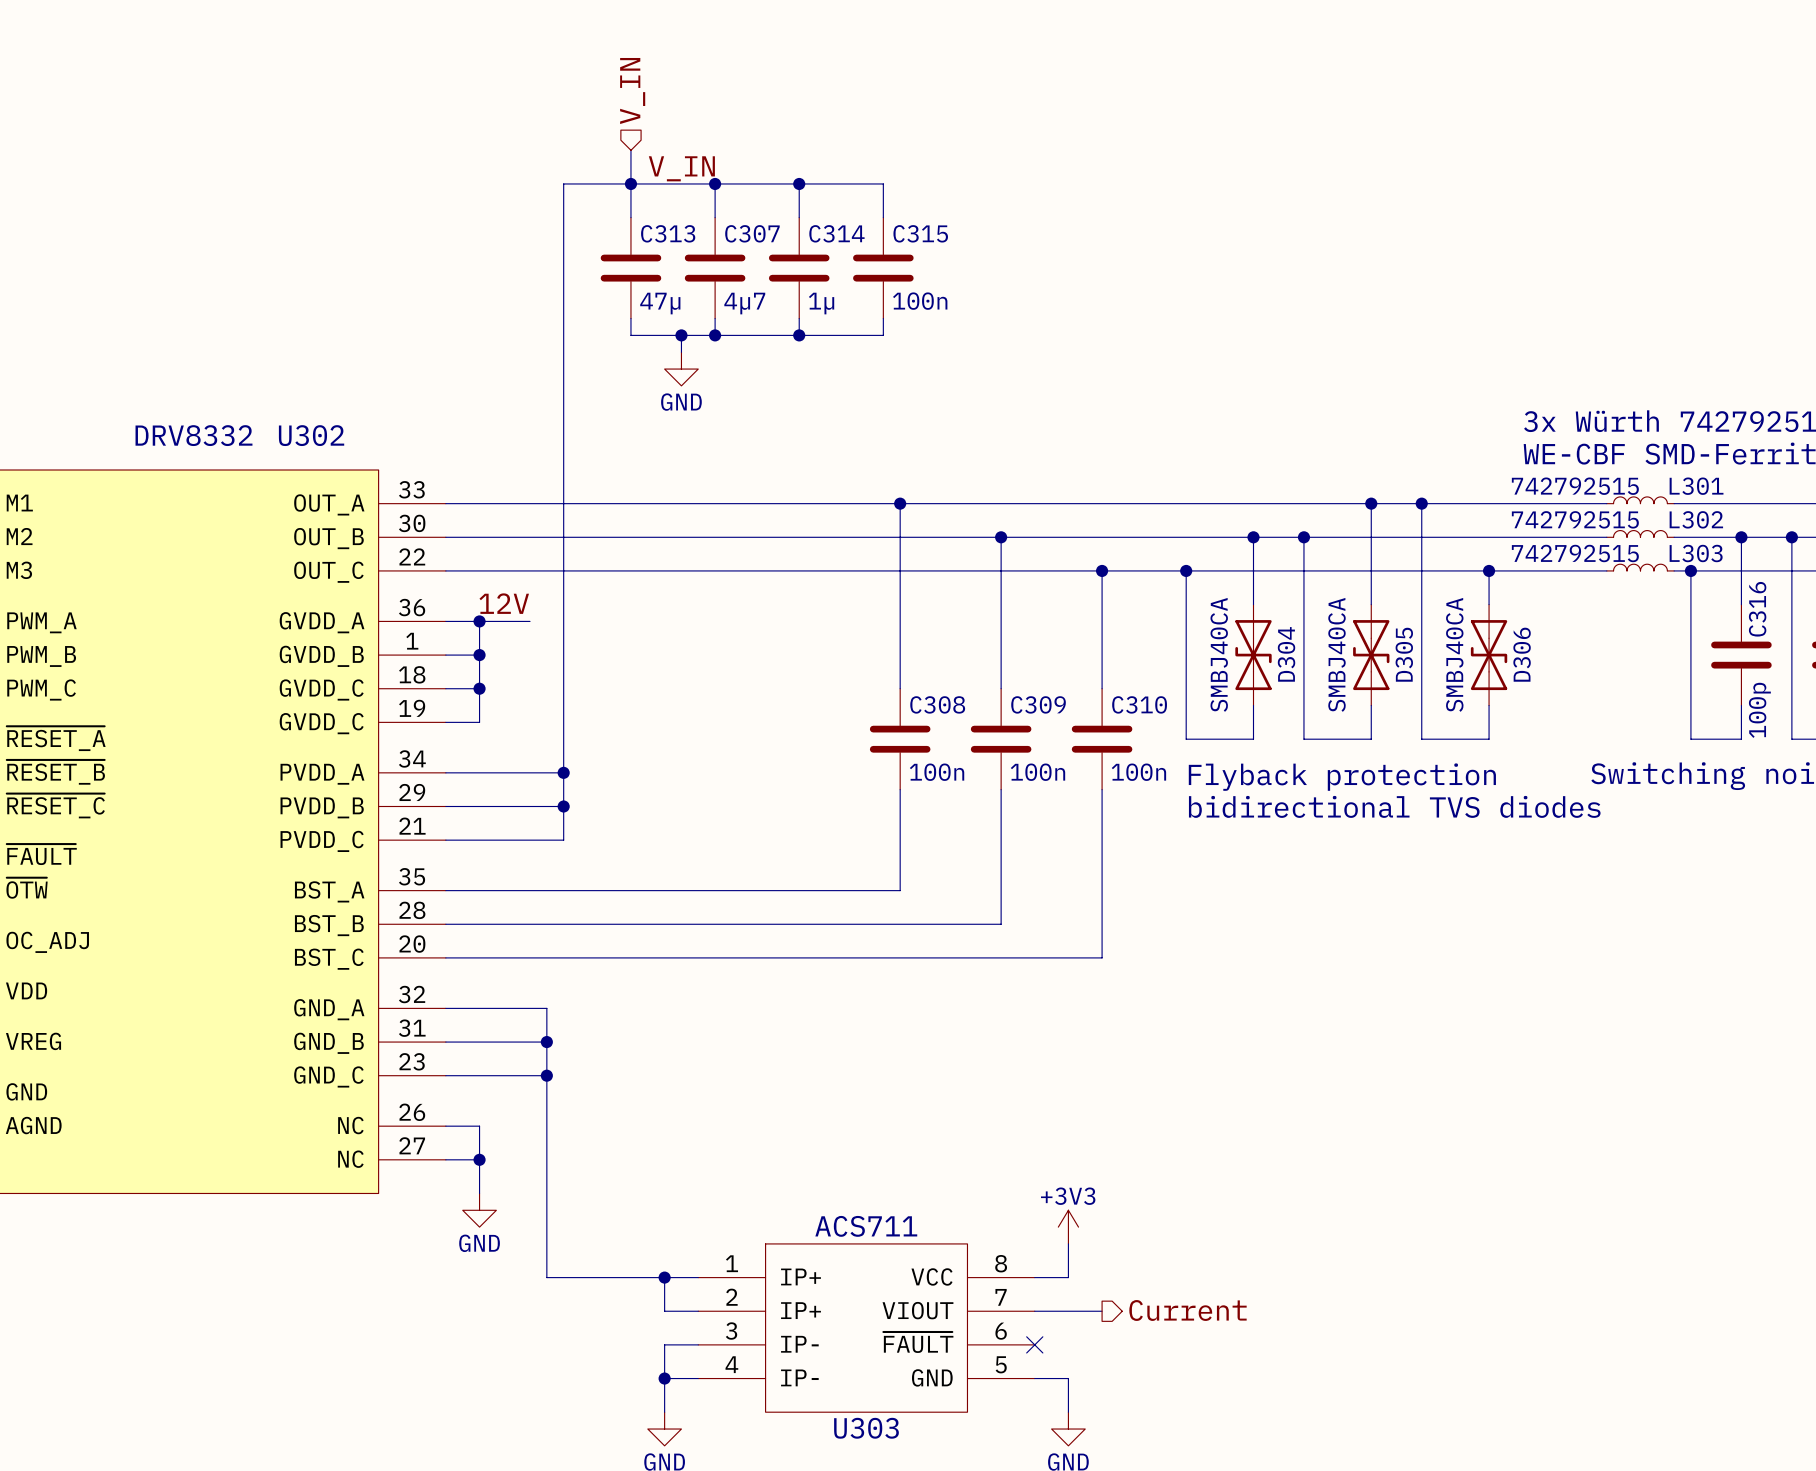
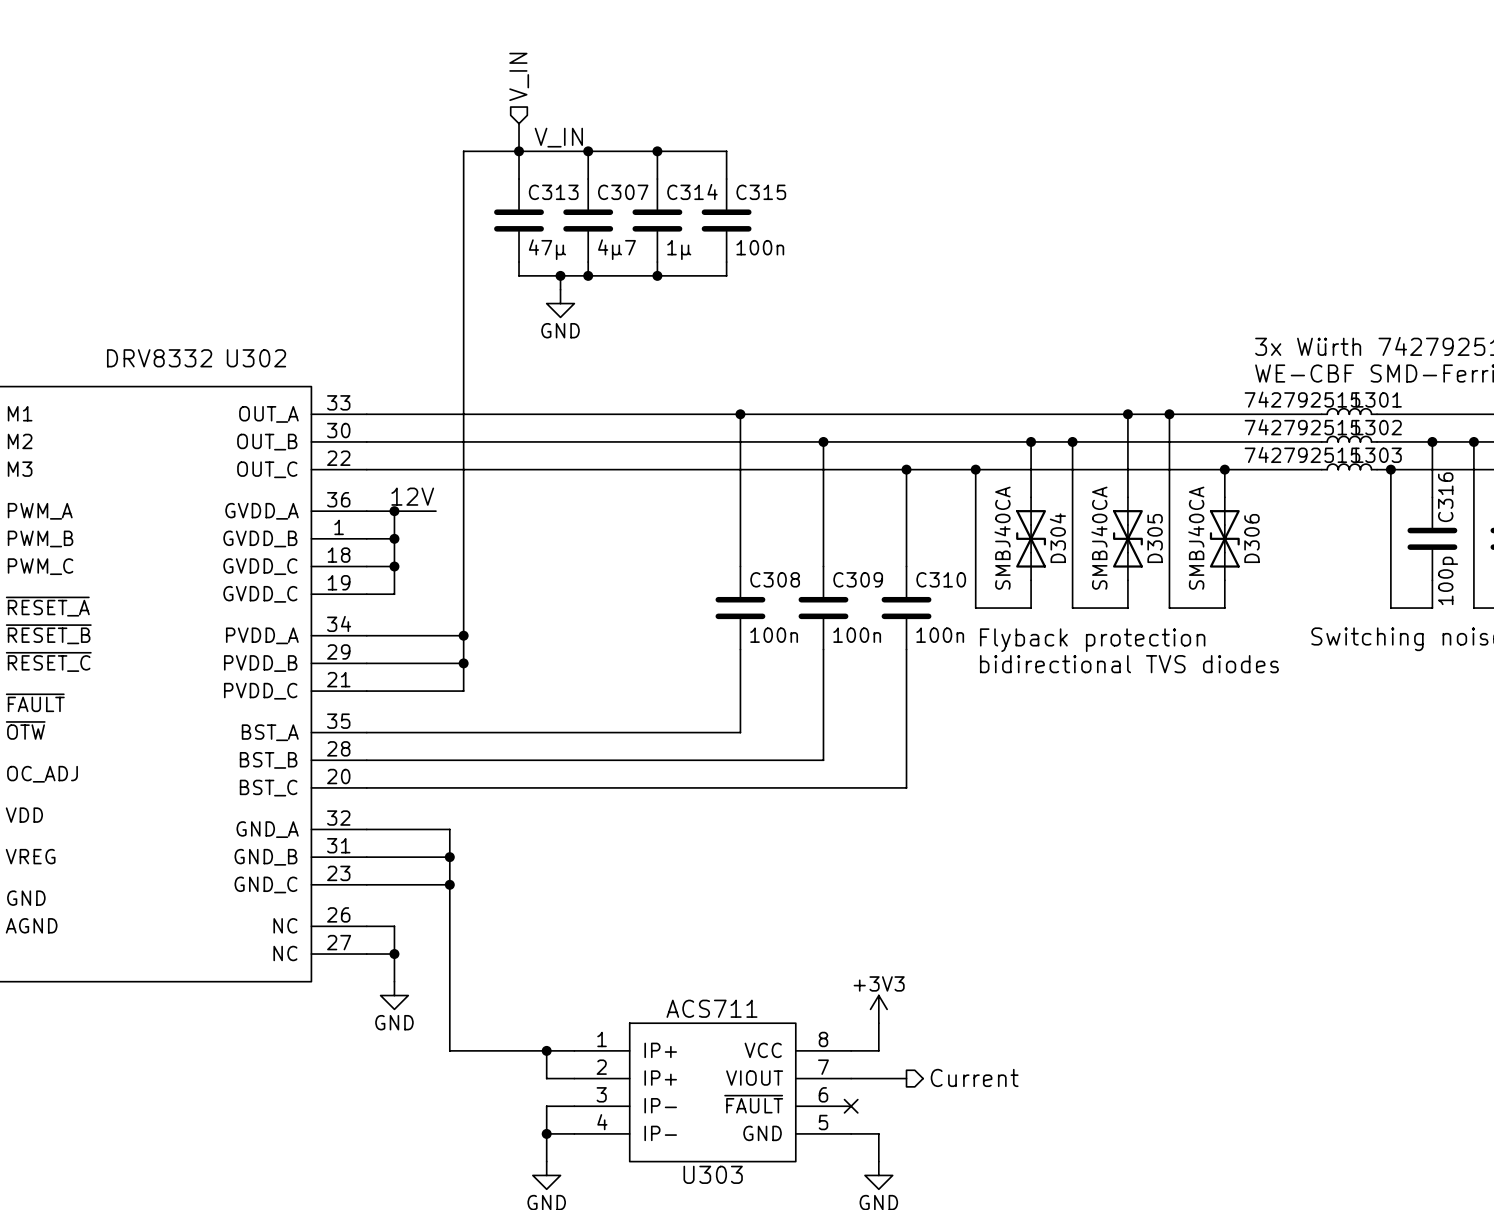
L301 value position: 742792515 (1575, 486) -> 742792515 (1302, 399)
L301 name position: L301 (1696, 486) -> L301 (1378, 399)
L302 value position: 742792515 (1575, 519) -> 742792515 (1302, 427)
L302 name position: L302 (1696, 519) -> L302 (1378, 427)
L303 value position: 742792515 (1575, 553) -> 742792515 (1302, 454)
L303 name position: L303 (1696, 553) -> L303 (1378, 455)

